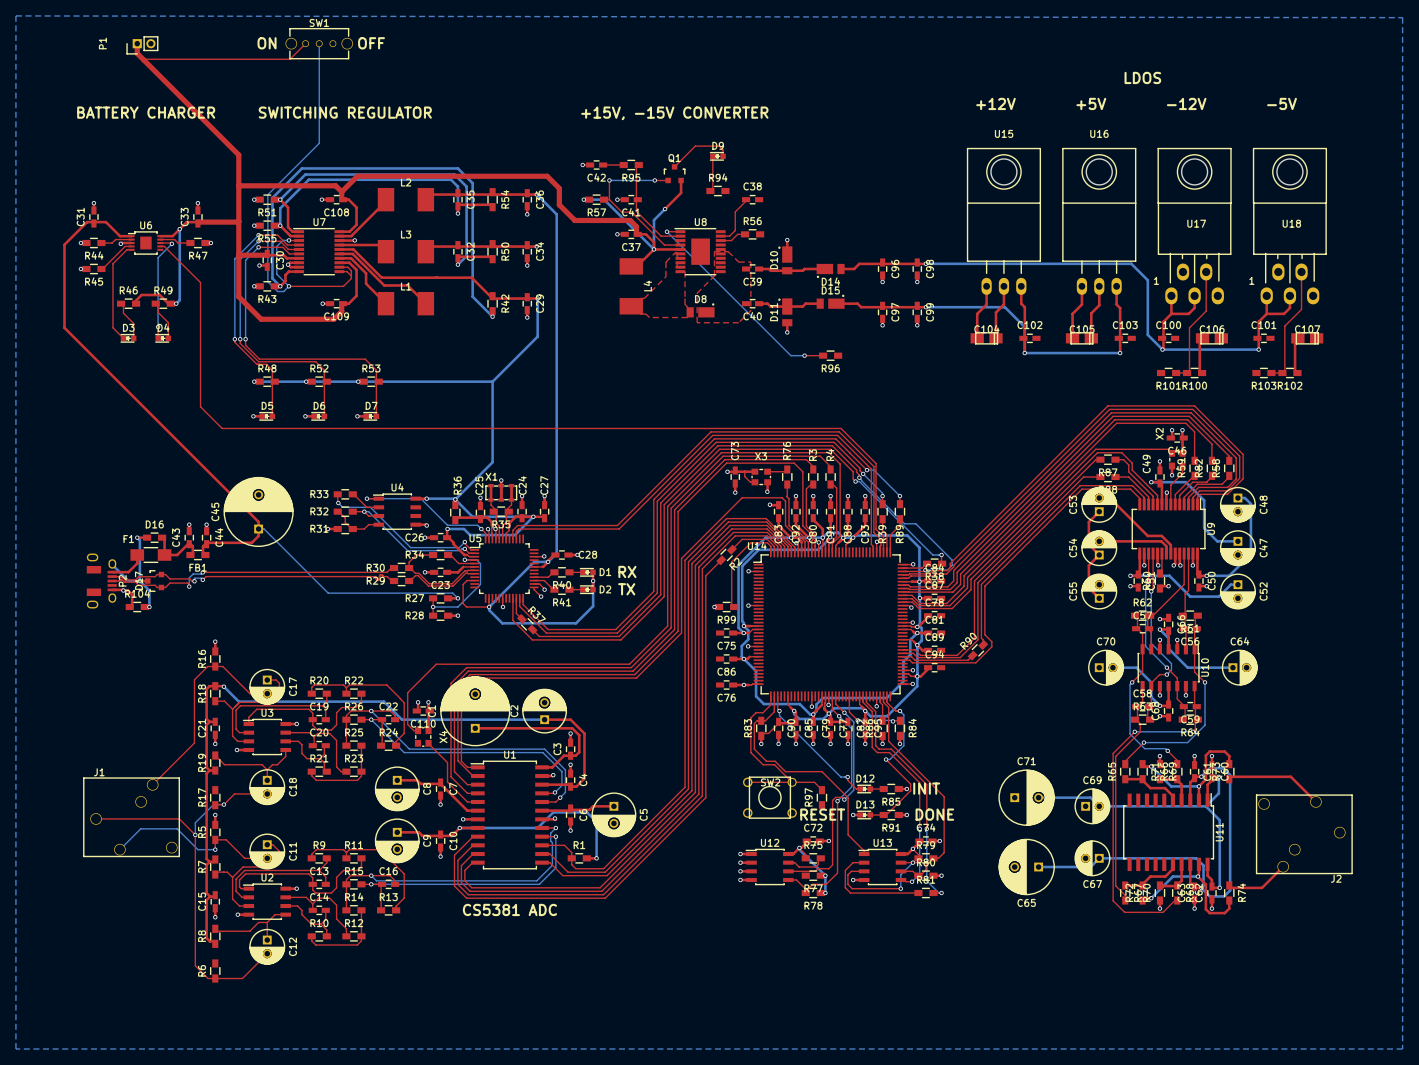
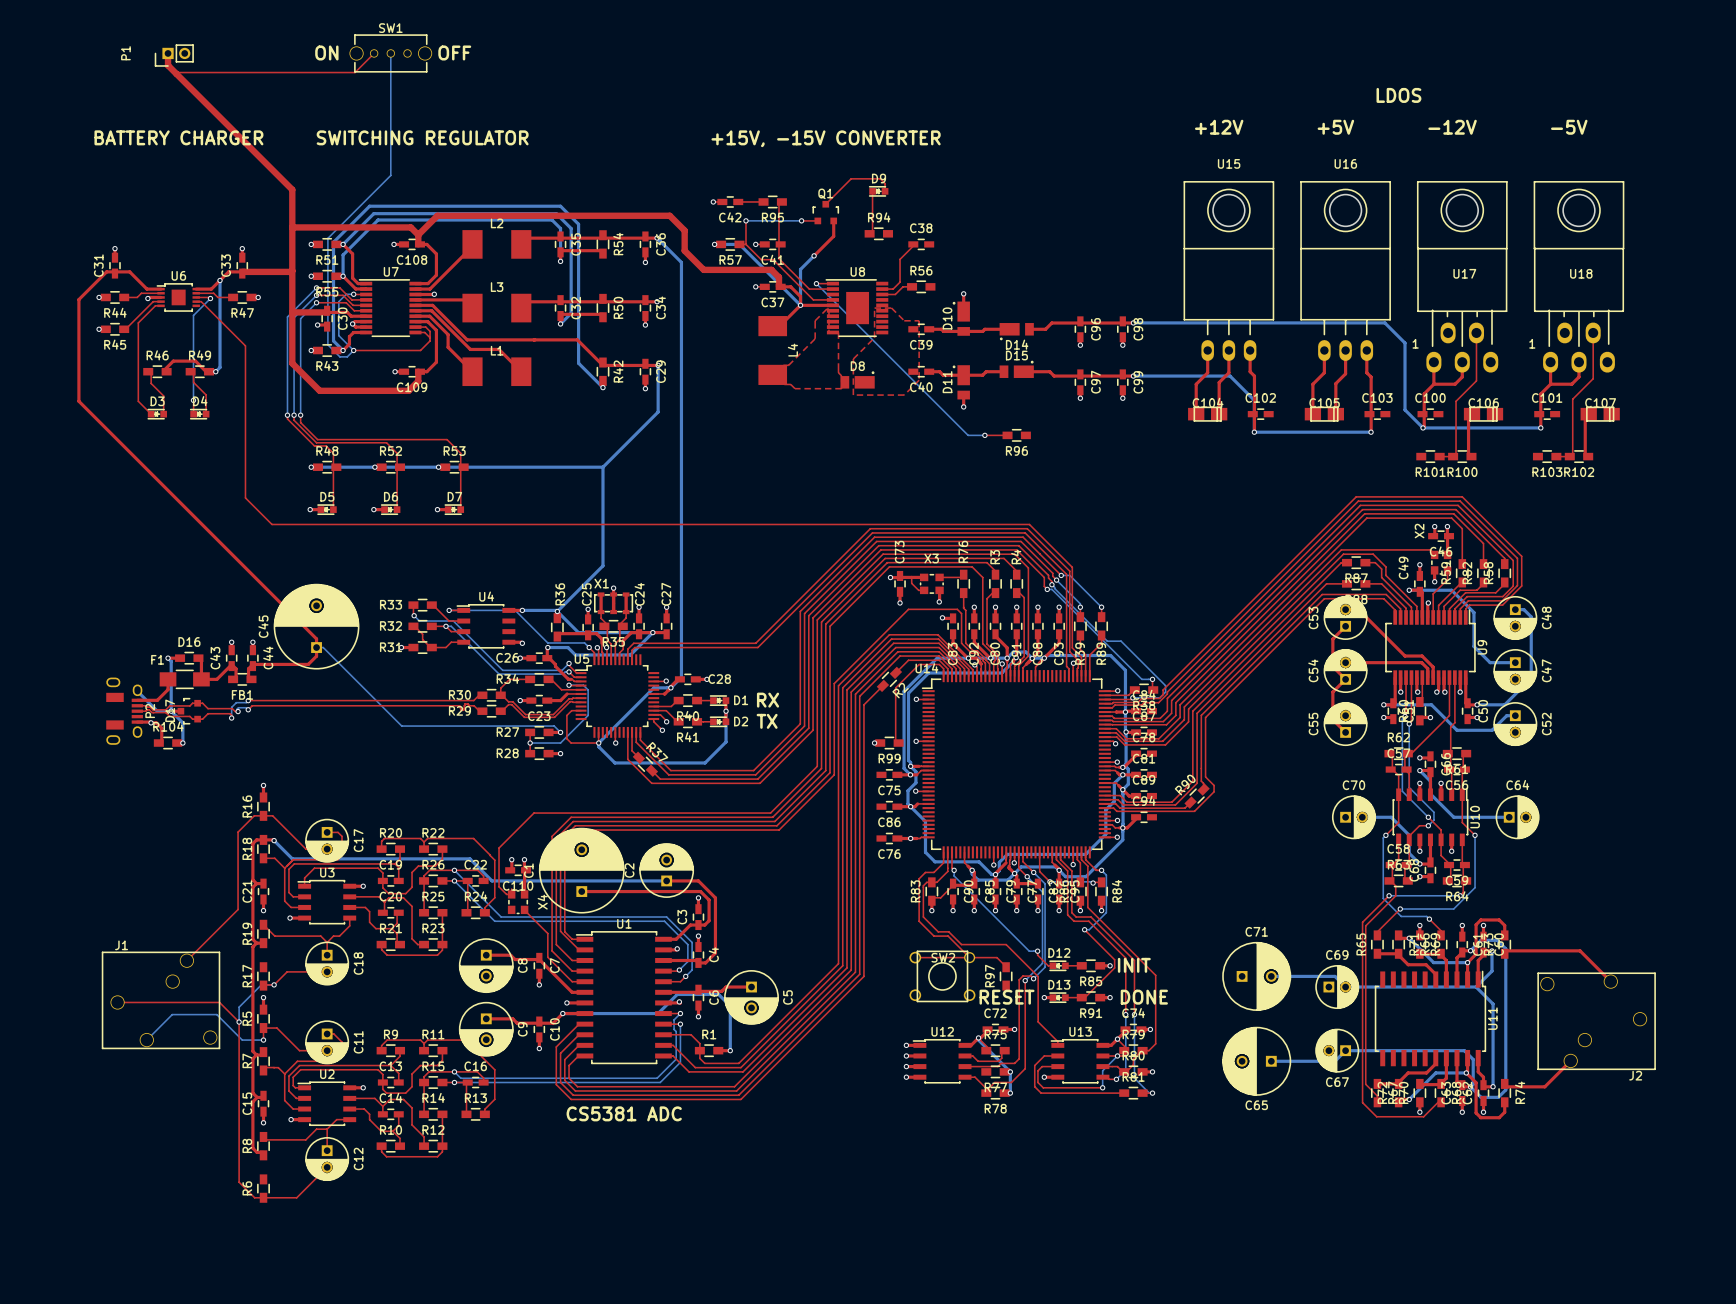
bottom zone outline: (15, 15) (15, 1049) (1402, 1049) (1402, 17) (15, 15) -> none

